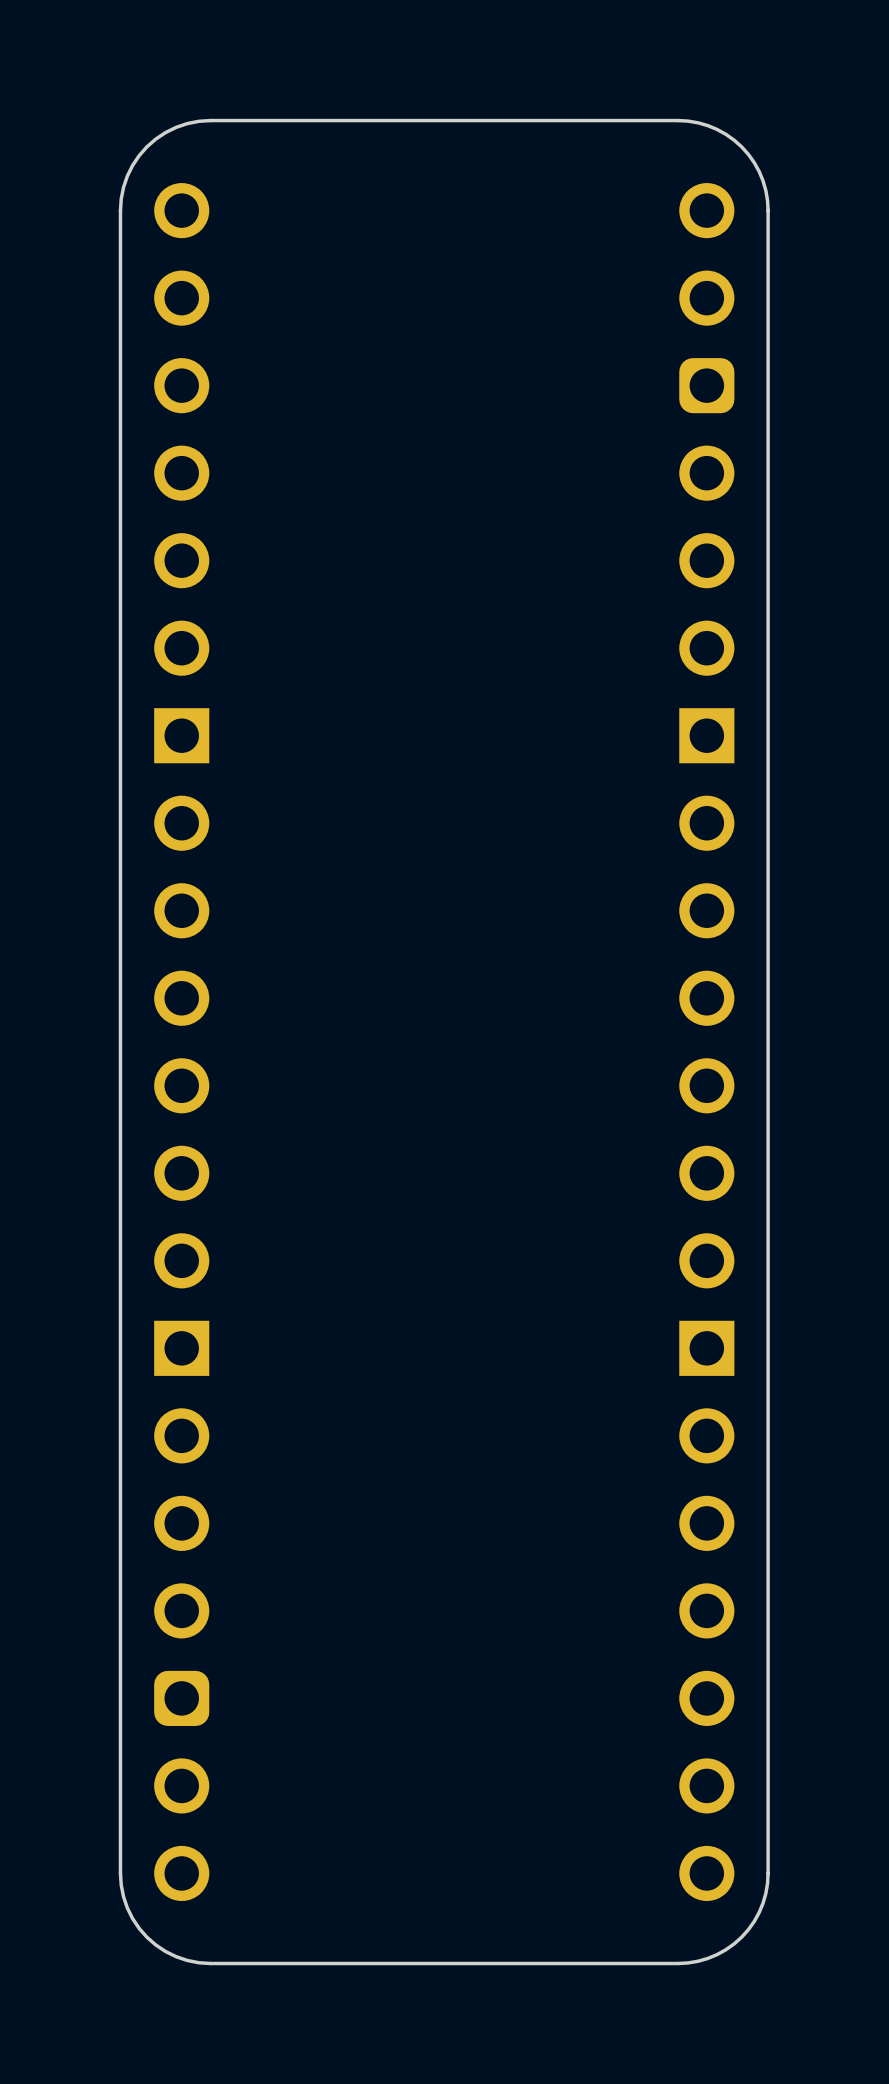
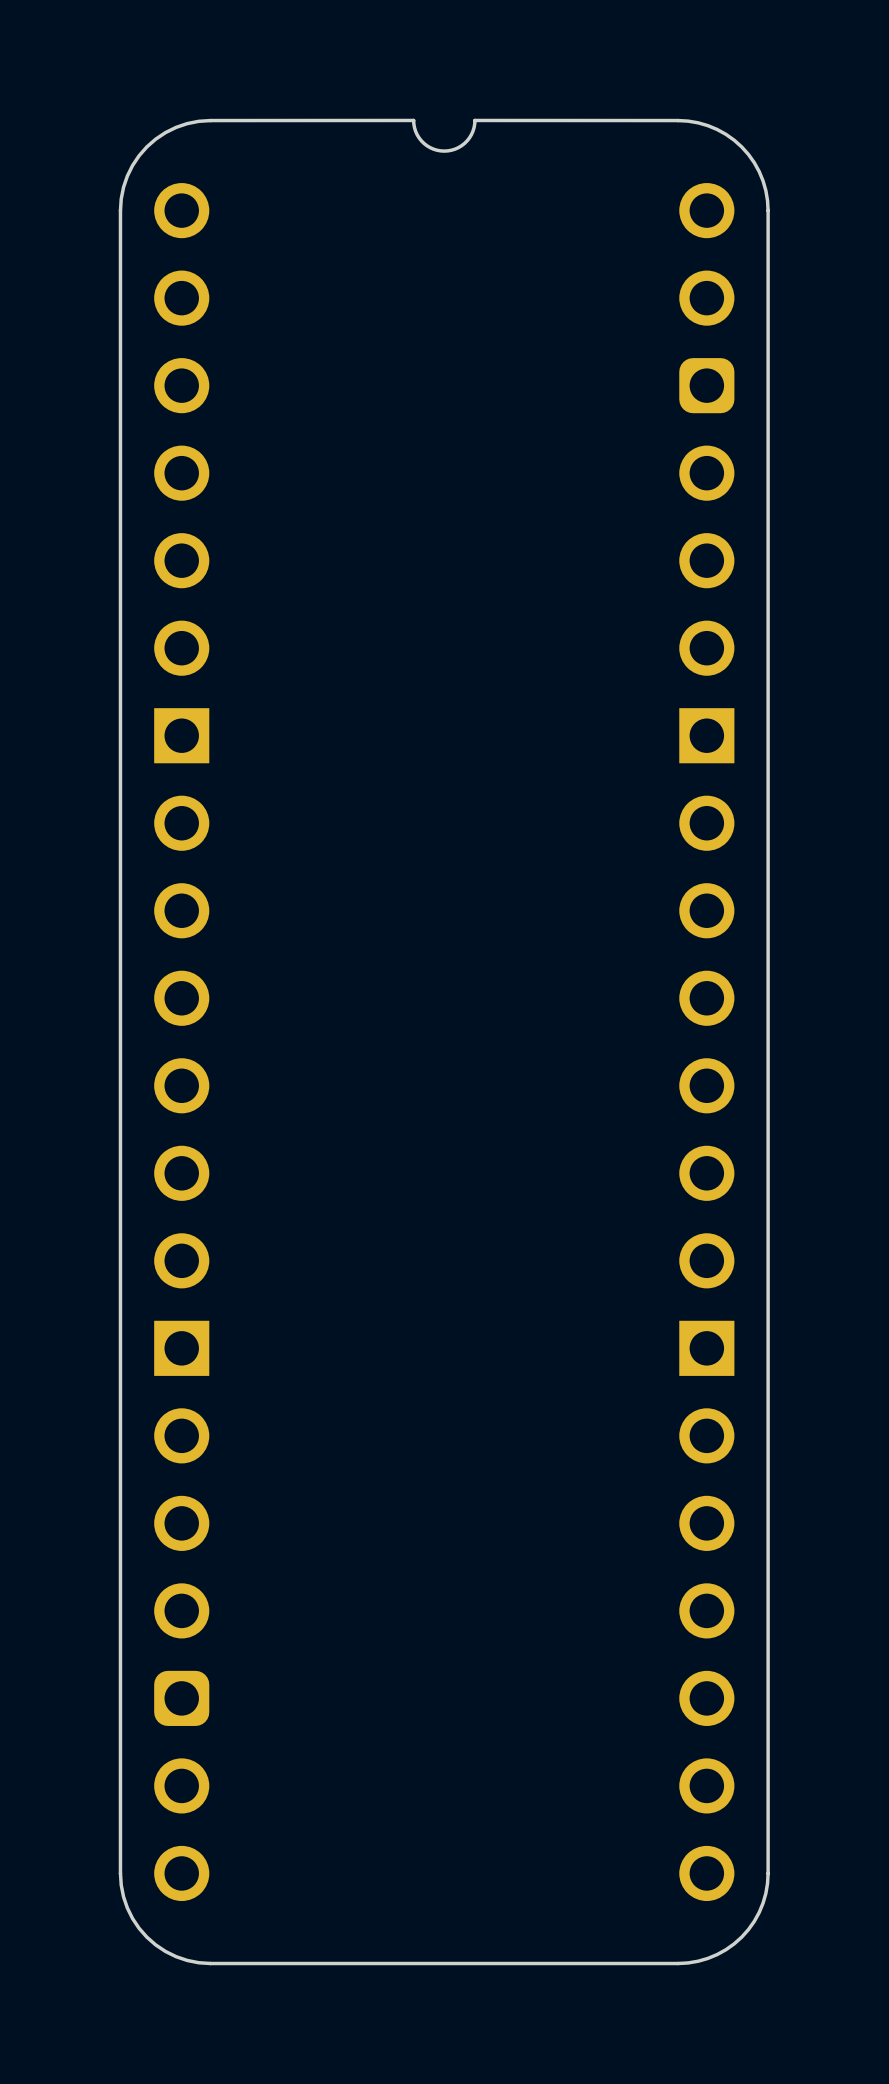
part footprint: [118, 118, 770, 1966] -> [118, 118, 770, 1966]

